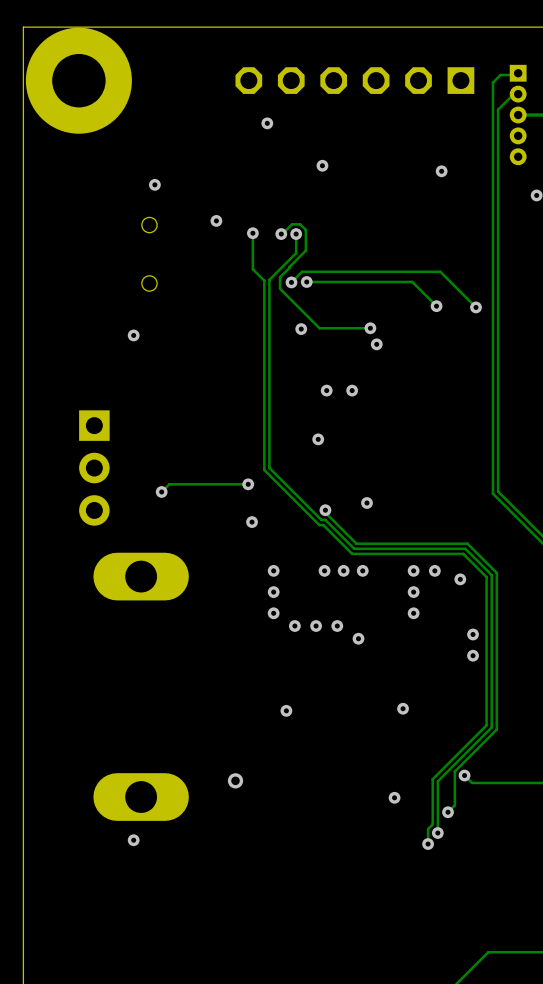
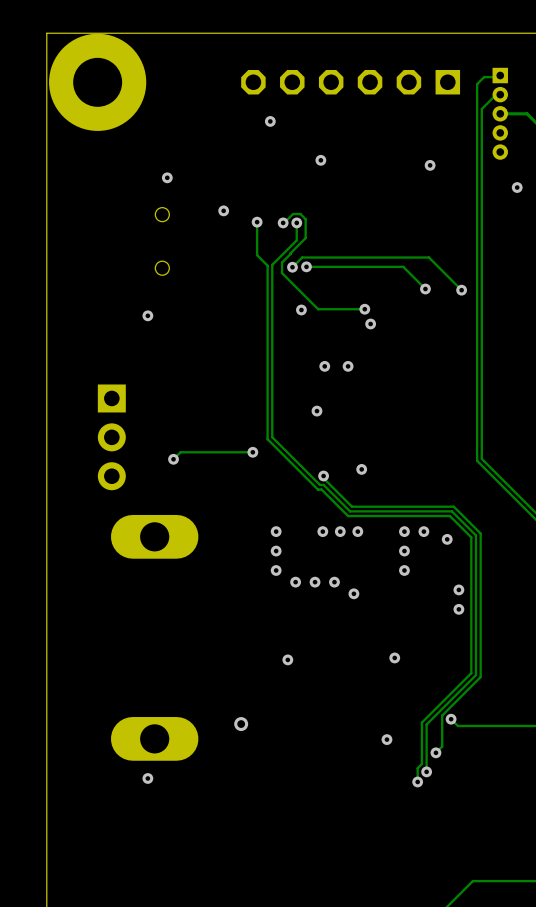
via: (252, 522) -> none

